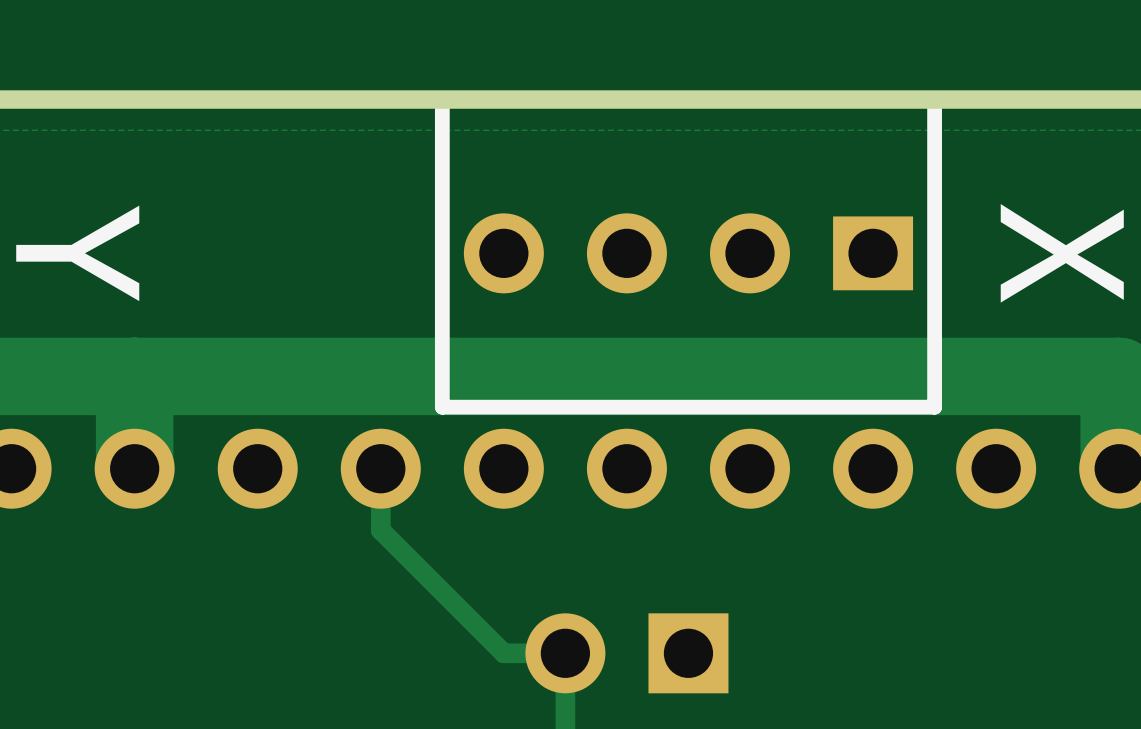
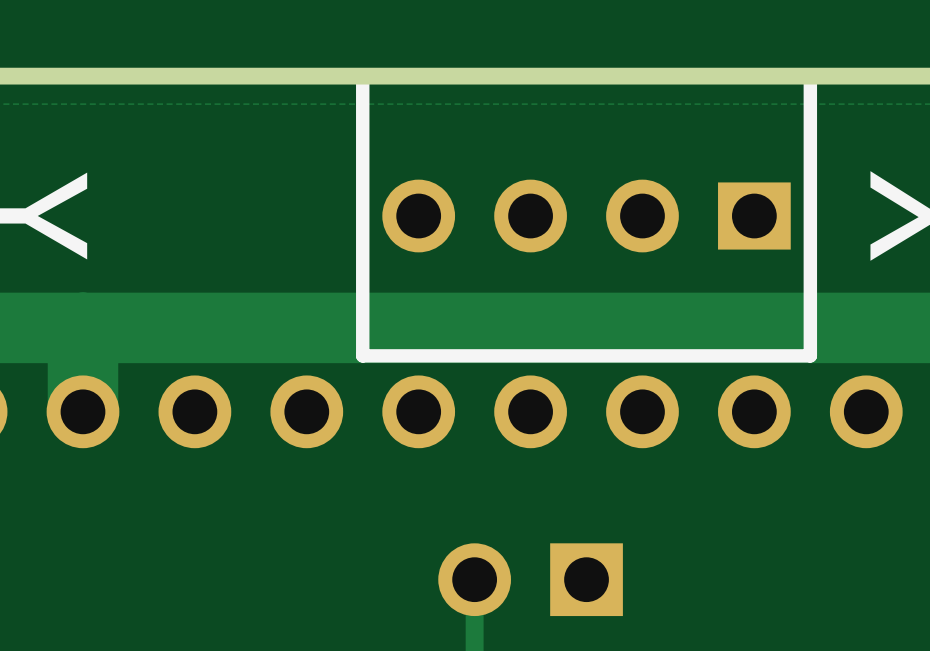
track: (380, 468) (380, 530) (503, 653) (565, 653) -> none

